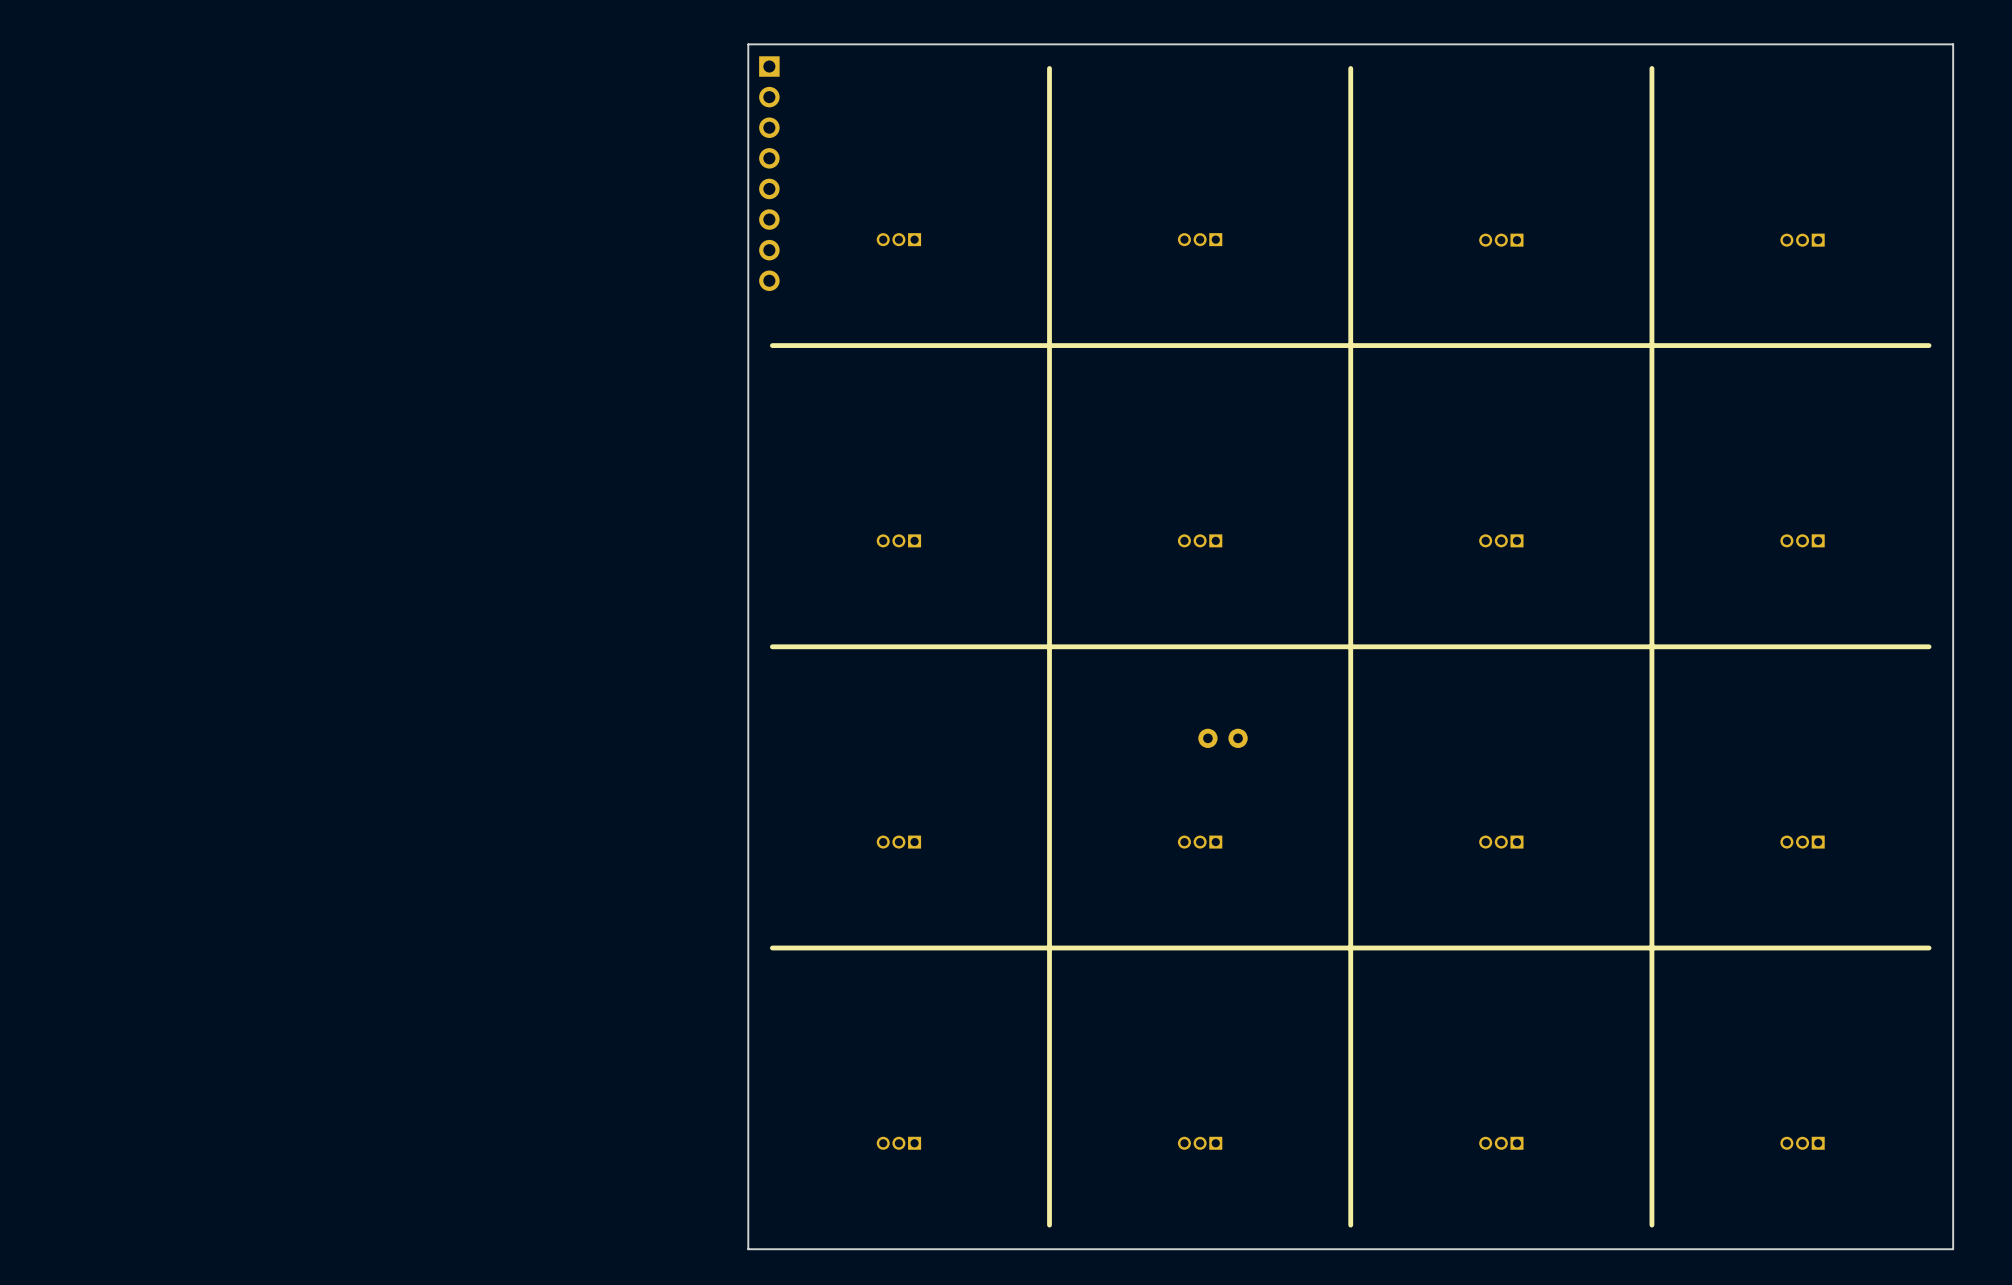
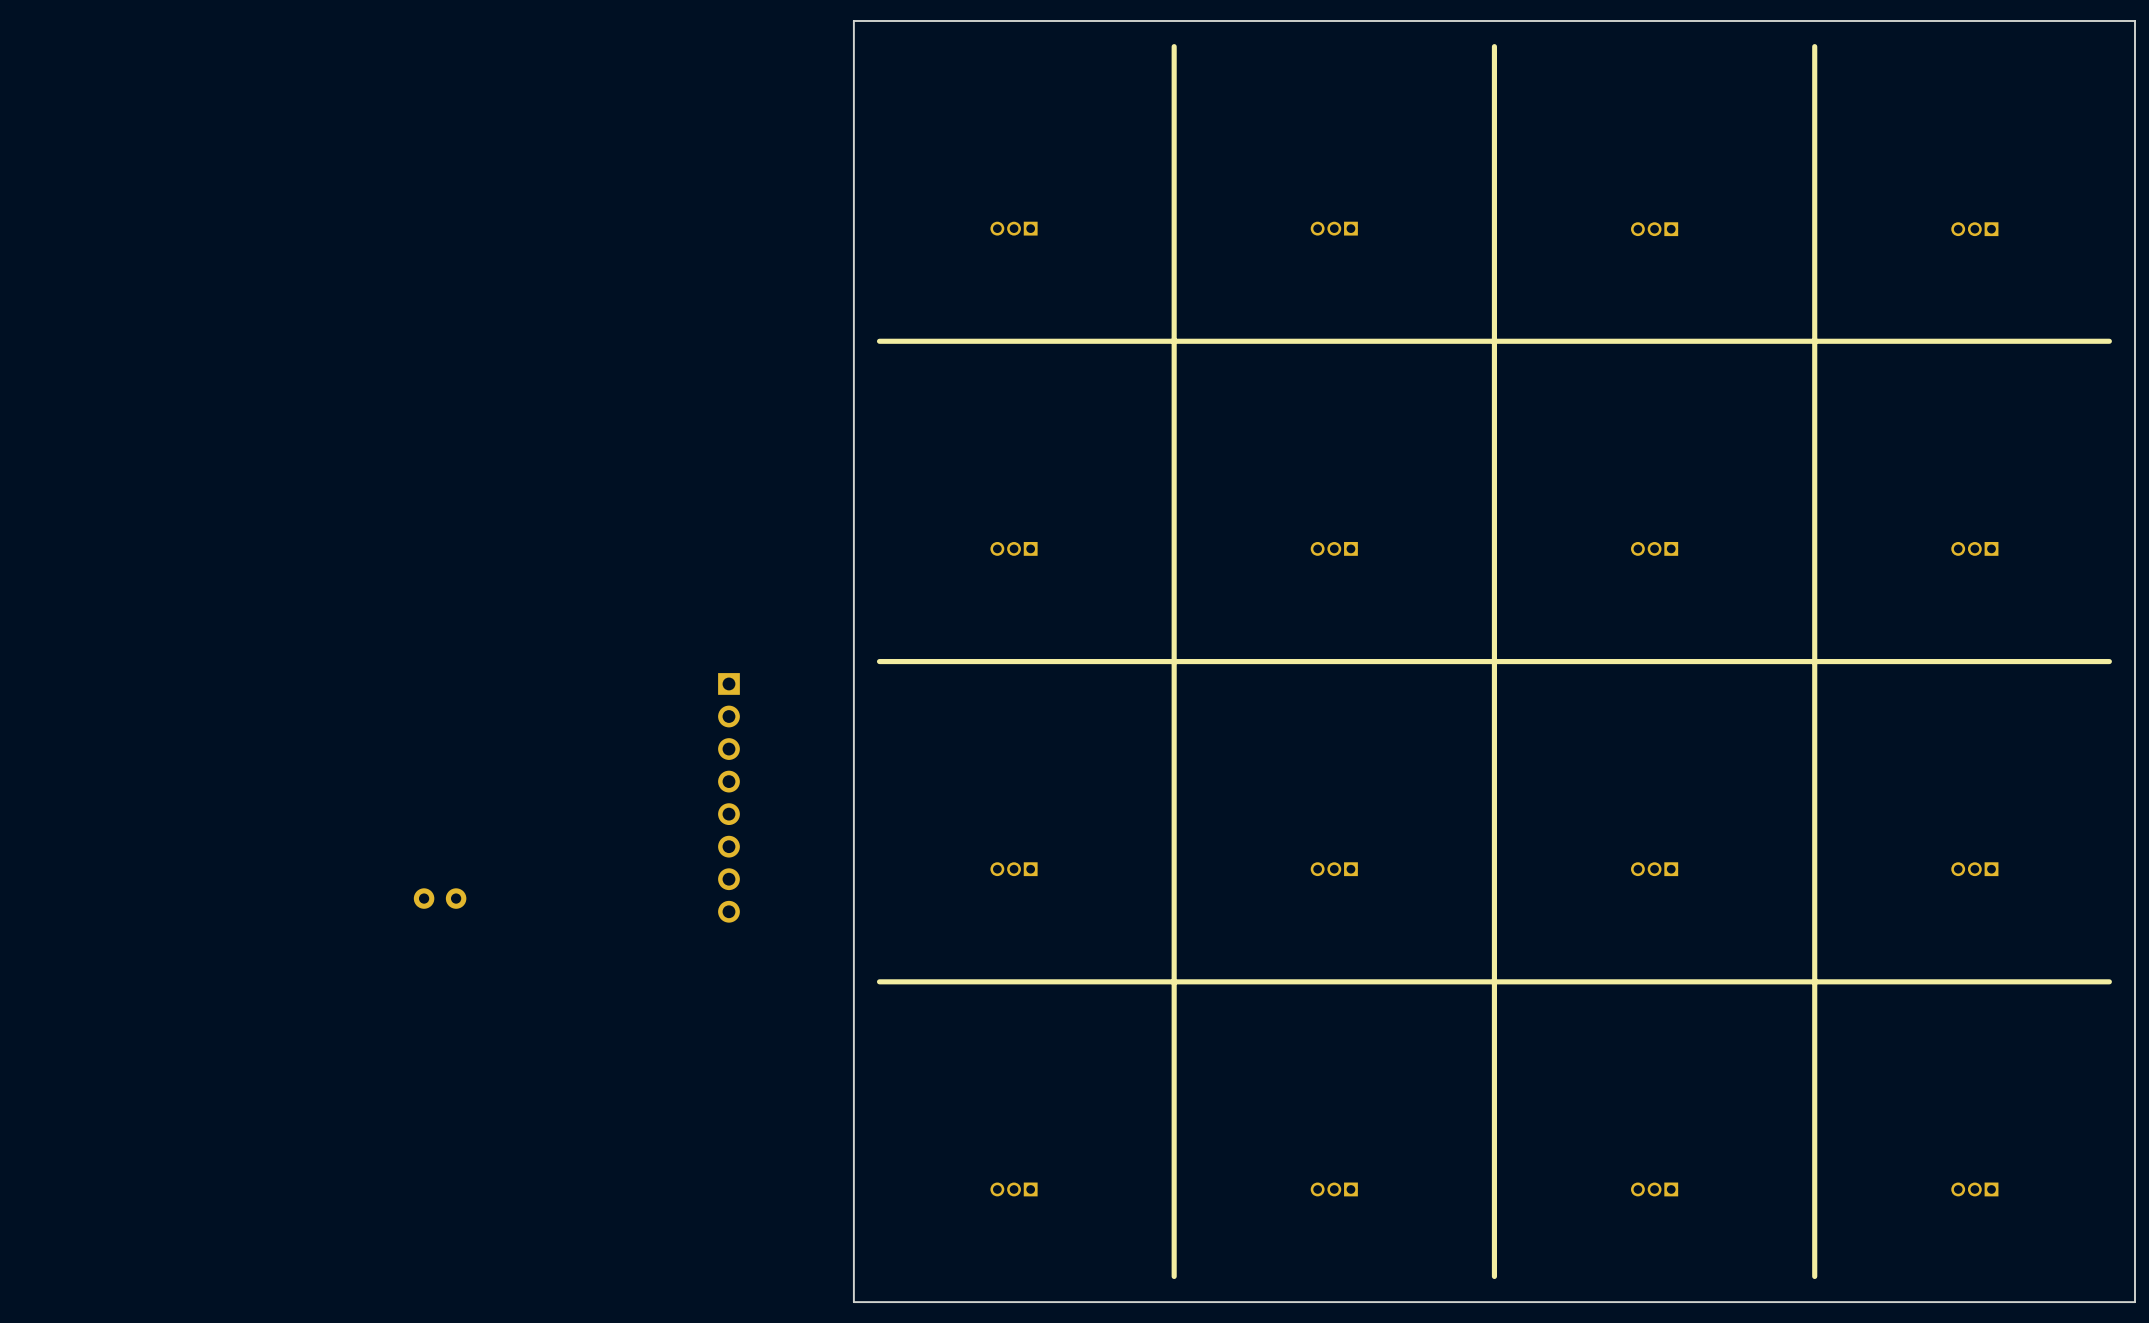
part: (769, 173) -> none
part: (1223, 738) -> none
part: none -> (728, 797)
part: none -> (440, 898)

